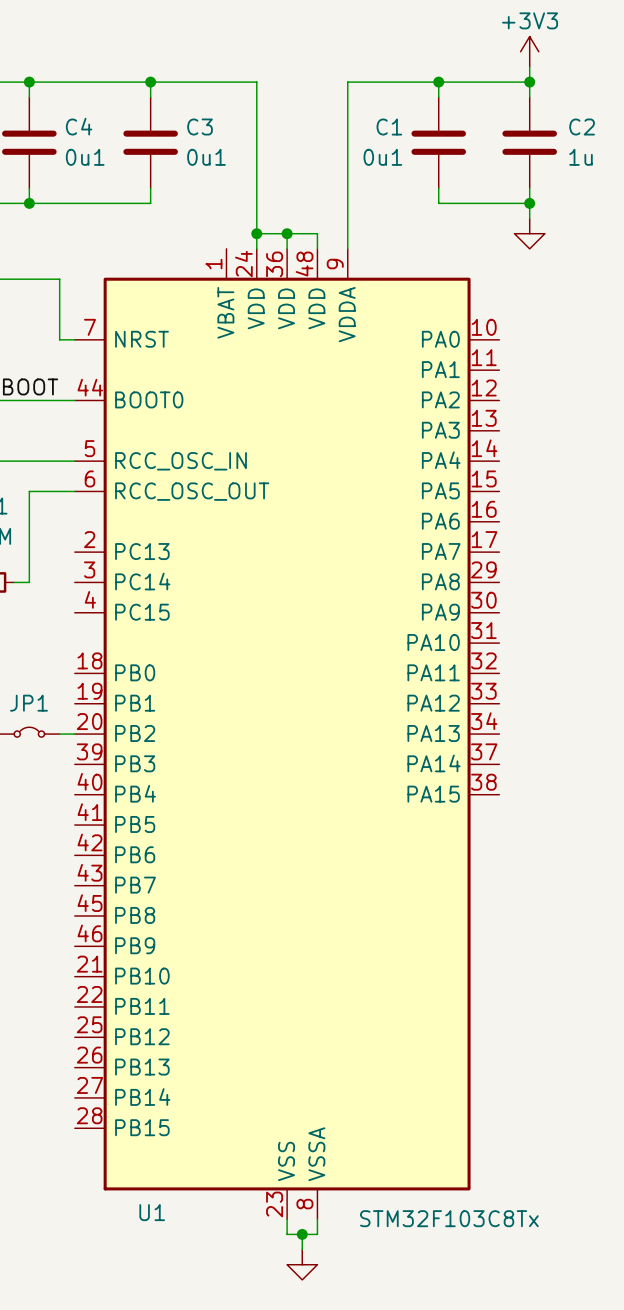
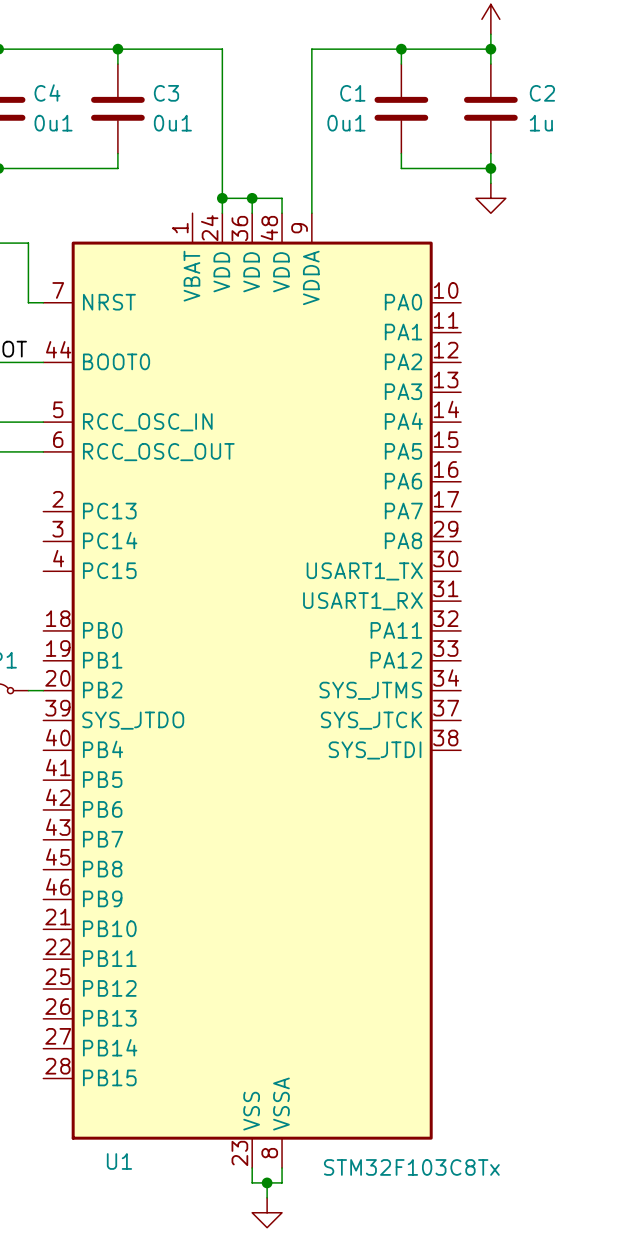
U1 pin name: PA9 (440, 612) -> USART1_TX (364, 571)
U1 pin name: PA10 (433, 642) -> USART1_RX (362, 601)
U1 pin name: PA13 (433, 733) -> SYS_JTMS (370, 690)
U1 pin name: PB3 (135, 763) -> SYS_JTDO (133, 720)
U1 pin name: PA14 (433, 763) -> SYS_JTCK (371, 720)
U1 pin name: PA15 (433, 794) -> SYS_JTDI (375, 750)

